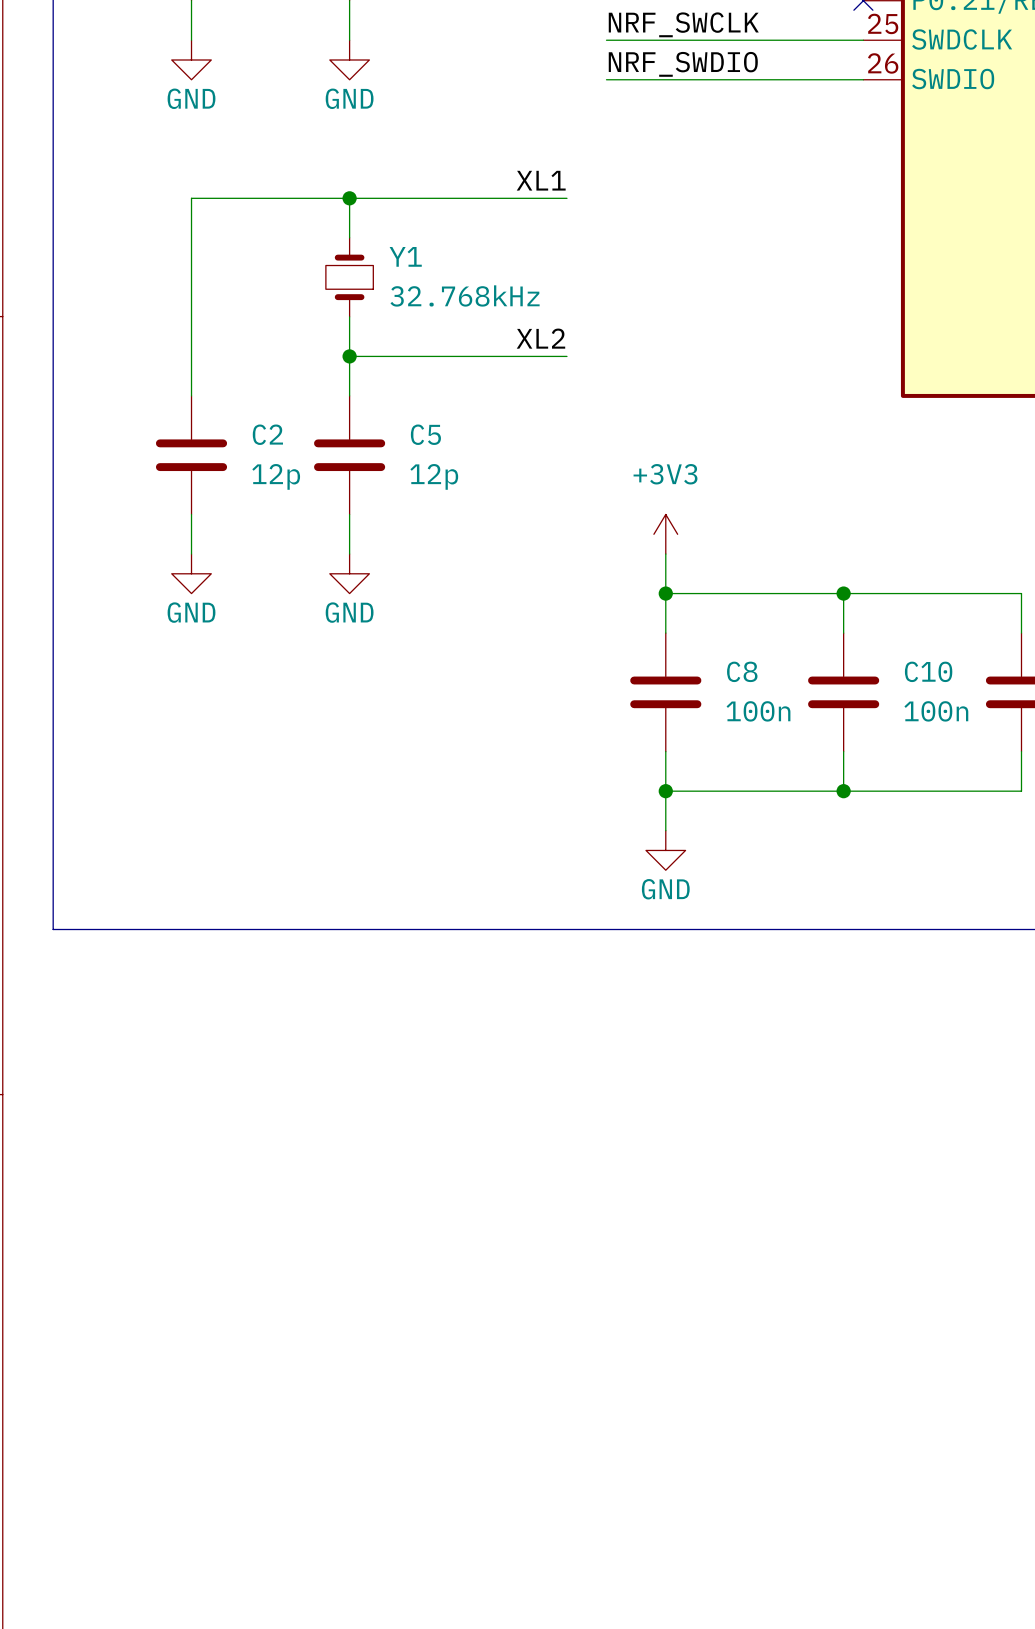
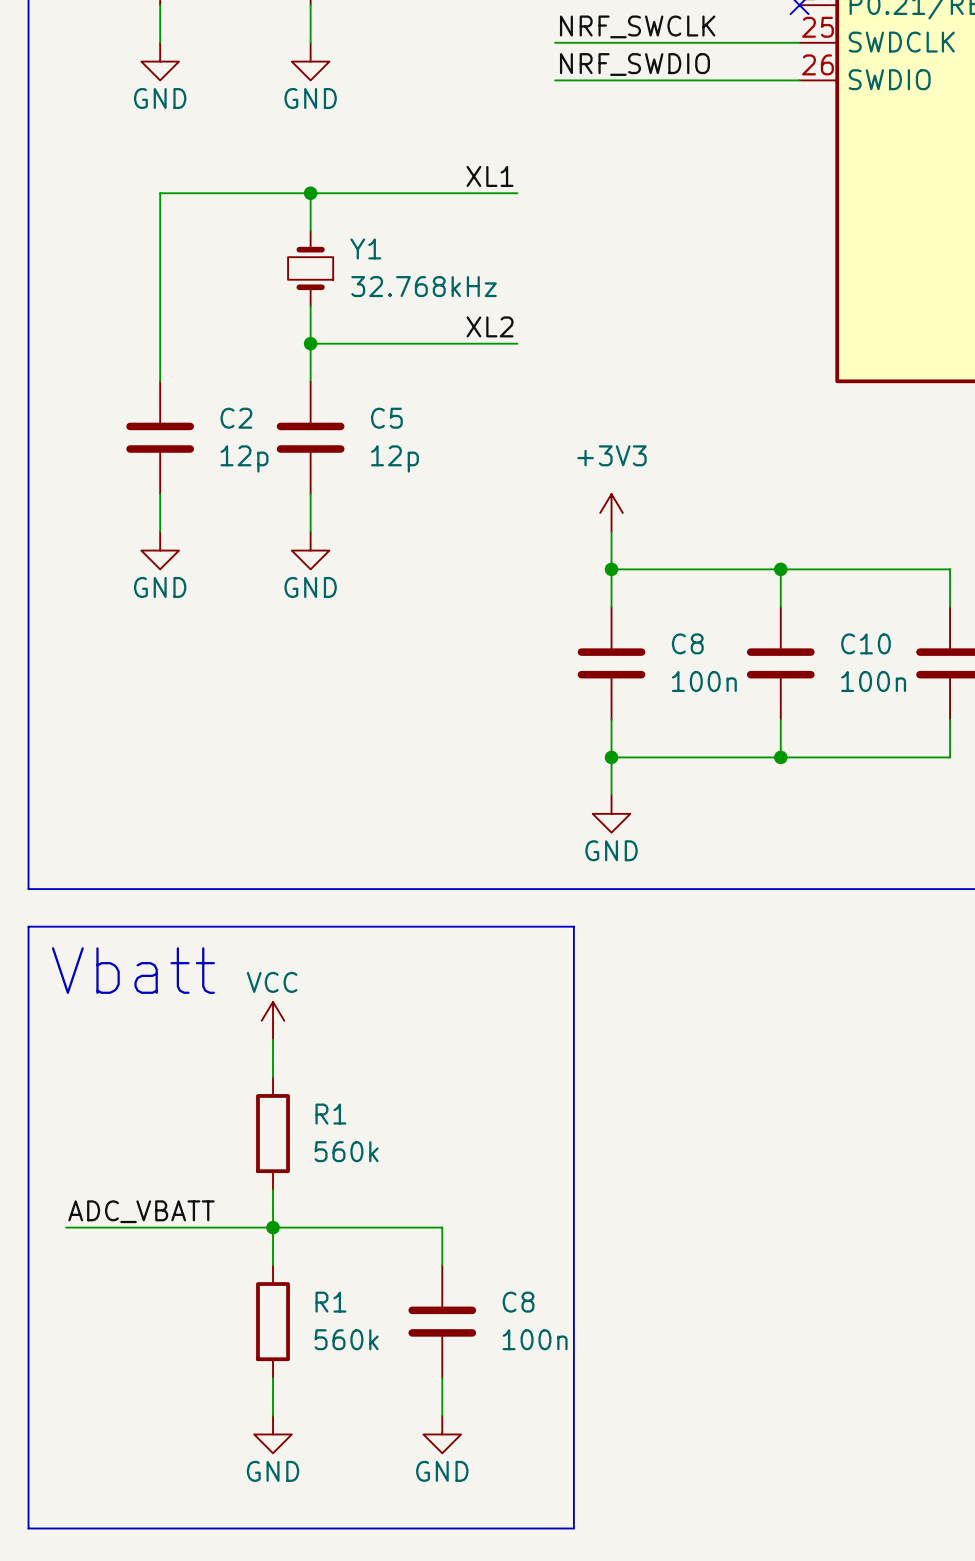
line: none -> (28, 926) (573, 926) (573, 1528) (28, 1528) (28, 926)
text: none -> Vbatt (133, 970)
power symbol: none -> VCC (273, 1020)
wire: none -> (273, 1039) (273, 1077)
R1: none -> 560k (273, 1133)
wire: none -> (273, 1189) (273, 1265)
label: none -> ADC_VBATT (141, 1211)
wire: none -> (66, 1227) (442, 1227) (442, 1265)
junction: none -> (273, 1227)
R1: none -> 560k (273, 1321)
C8: none -> 100n (442, 1321)
wire: none -> (273, 1378) (273, 1415)
wire: none -> (442, 1378) (442, 1415)
power symbol: none -> GND (273, 1434)
power symbol: none -> GND (442, 1434)

